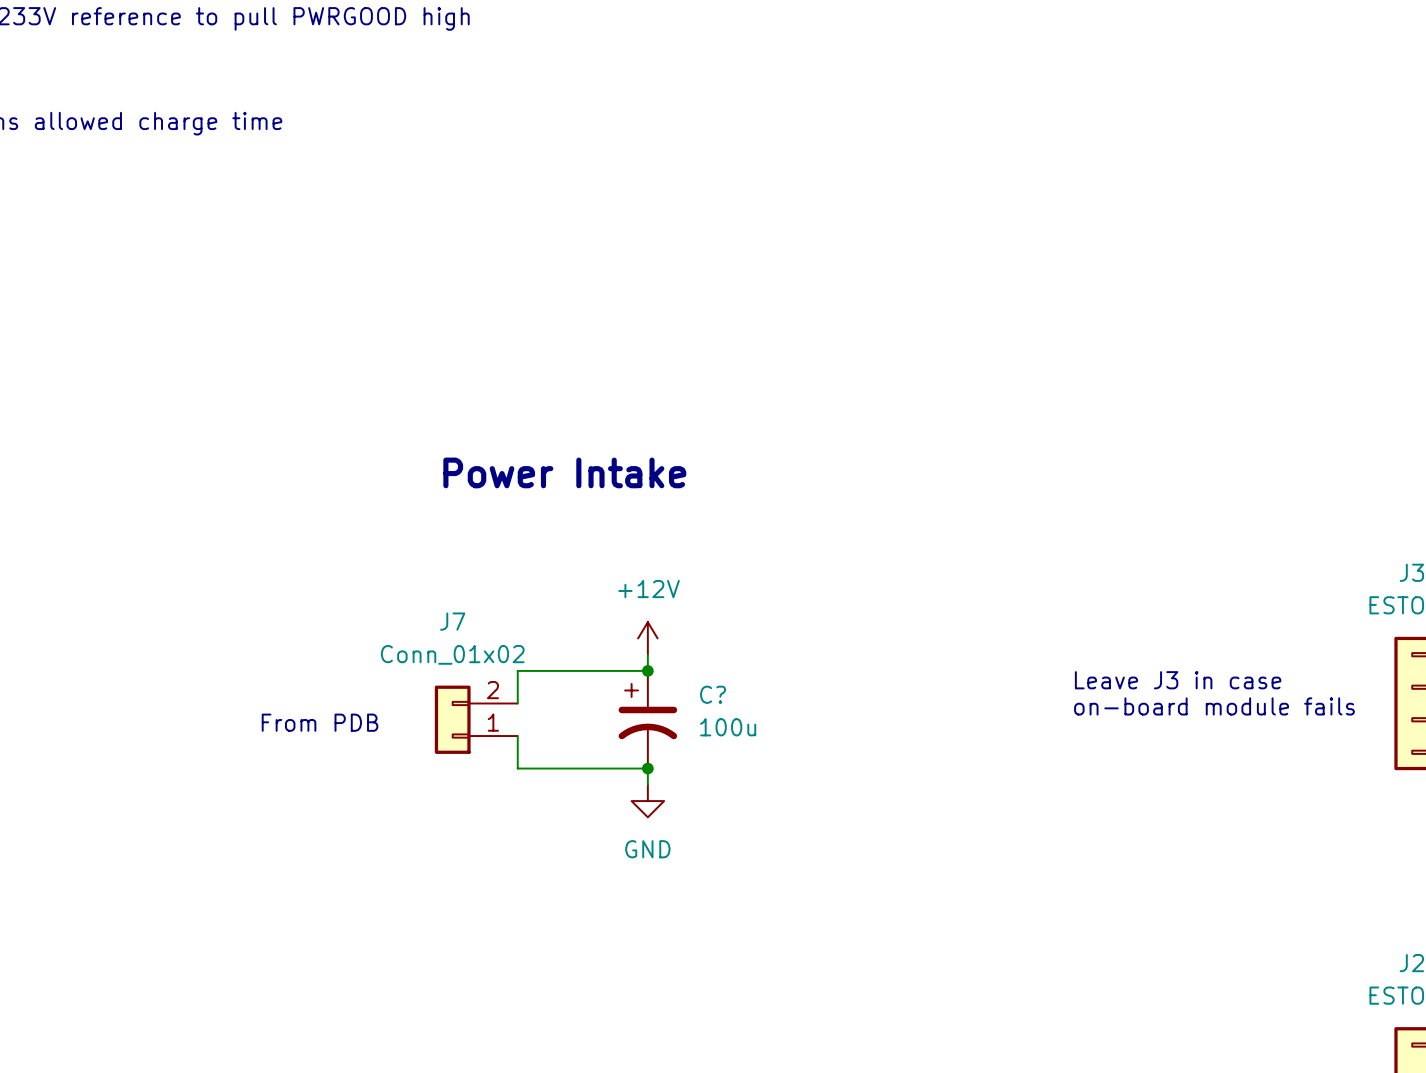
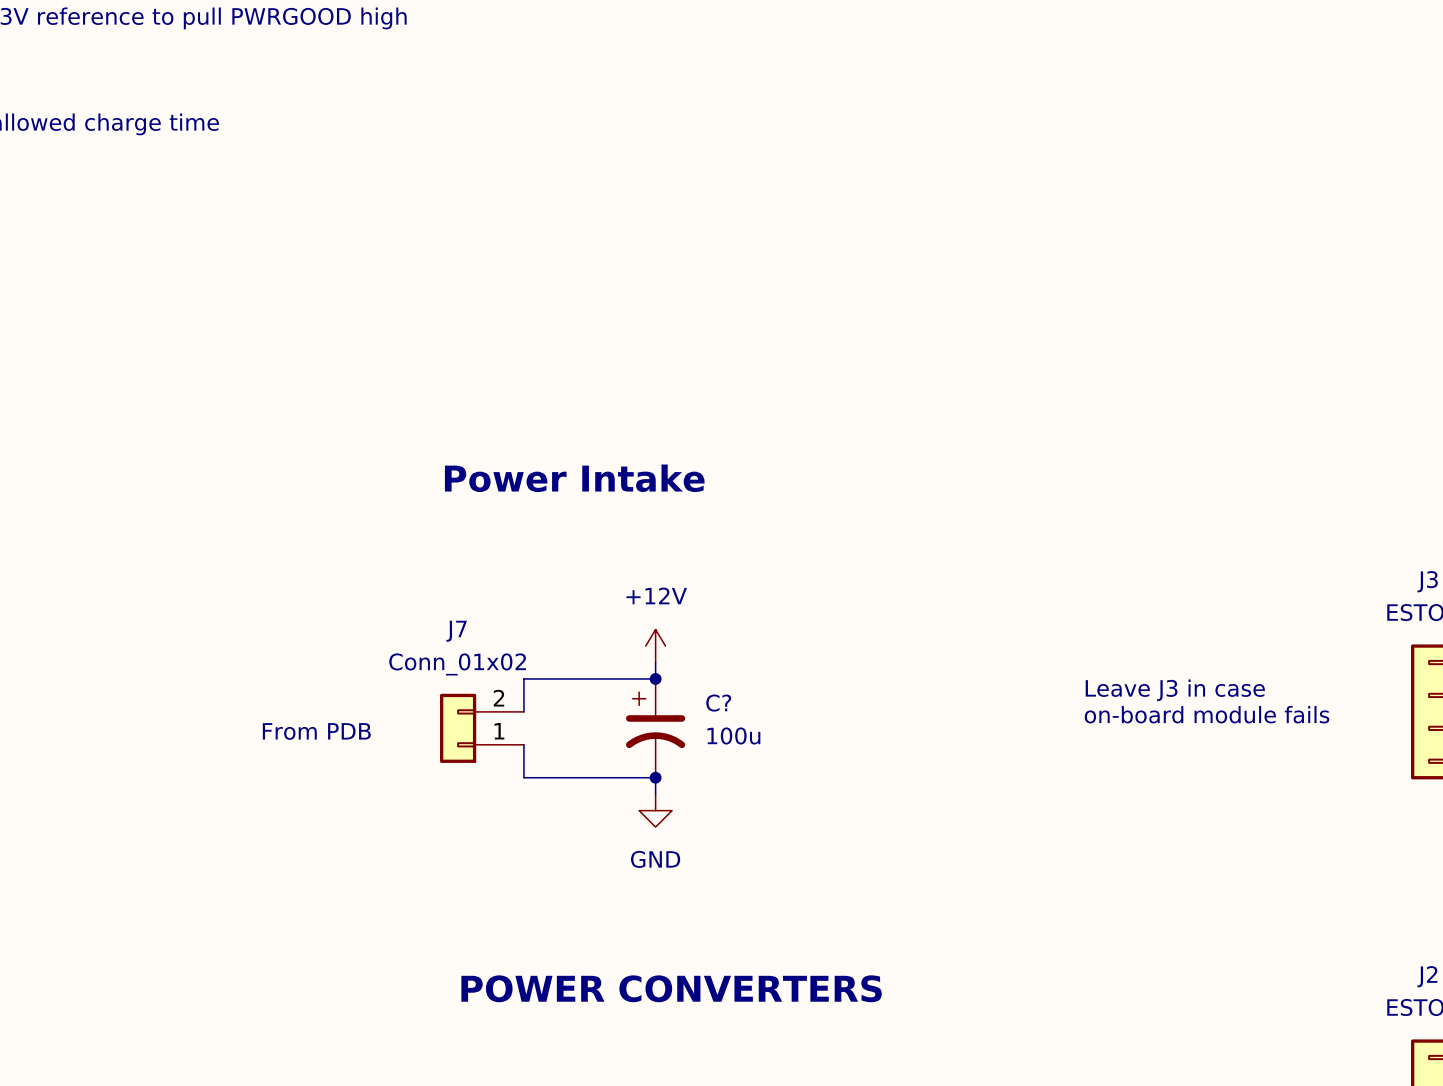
text: none -> POWER CONVERTERS (671, 988)

